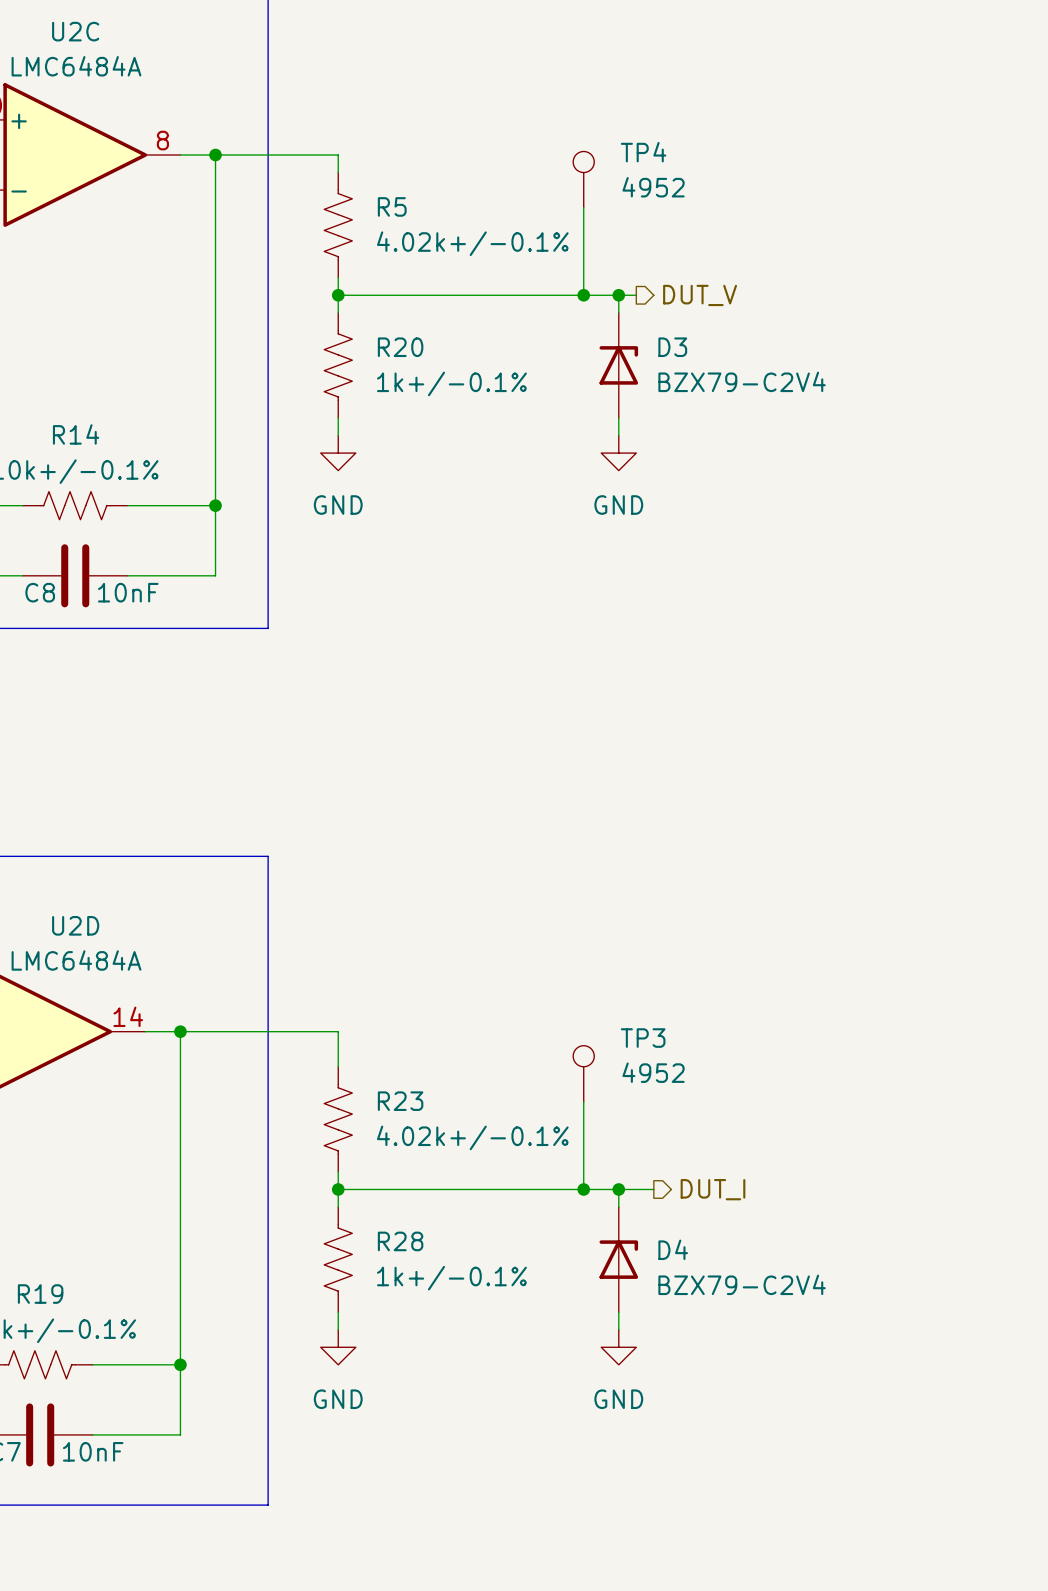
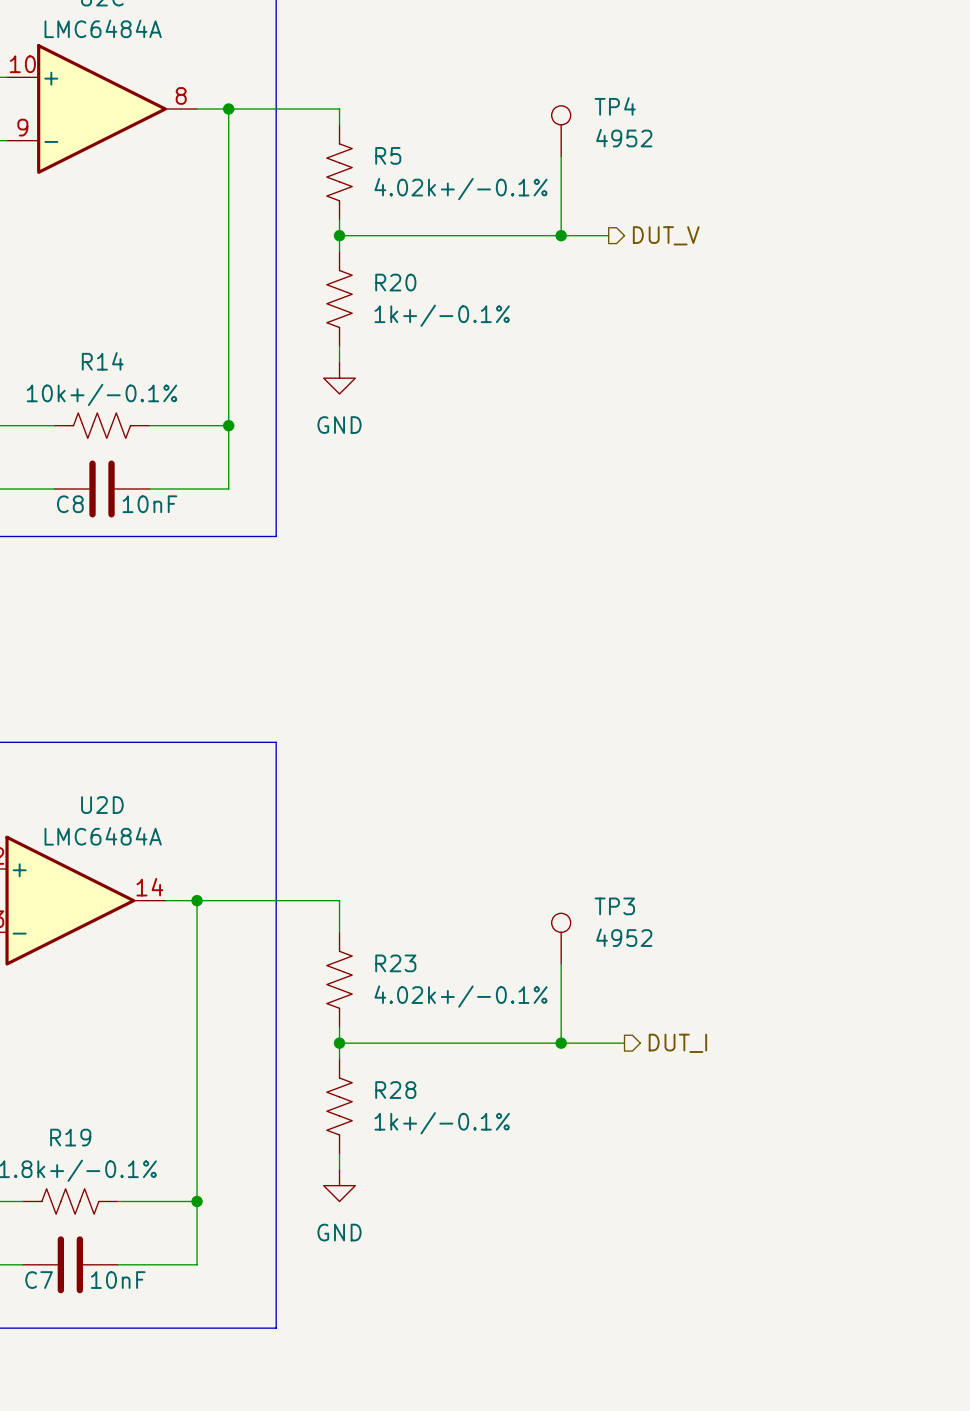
wire: (618, 295) (618, 312) -> none
junction: (618, 295) -> none
D3: BZX79-C2V4 (618, 365) -> none
wire: (618, 418) (618, 435) -> none
power symbol: GND (618, 453) -> none
wire: (618, 1189) (618, 1207) -> none
junction: (618, 1189) -> none
D4: BZX79-C2V4 (618, 1259) -> none
wire: (618, 1312) (618, 1329) -> none
power symbol: GND (618, 1347) -> none

